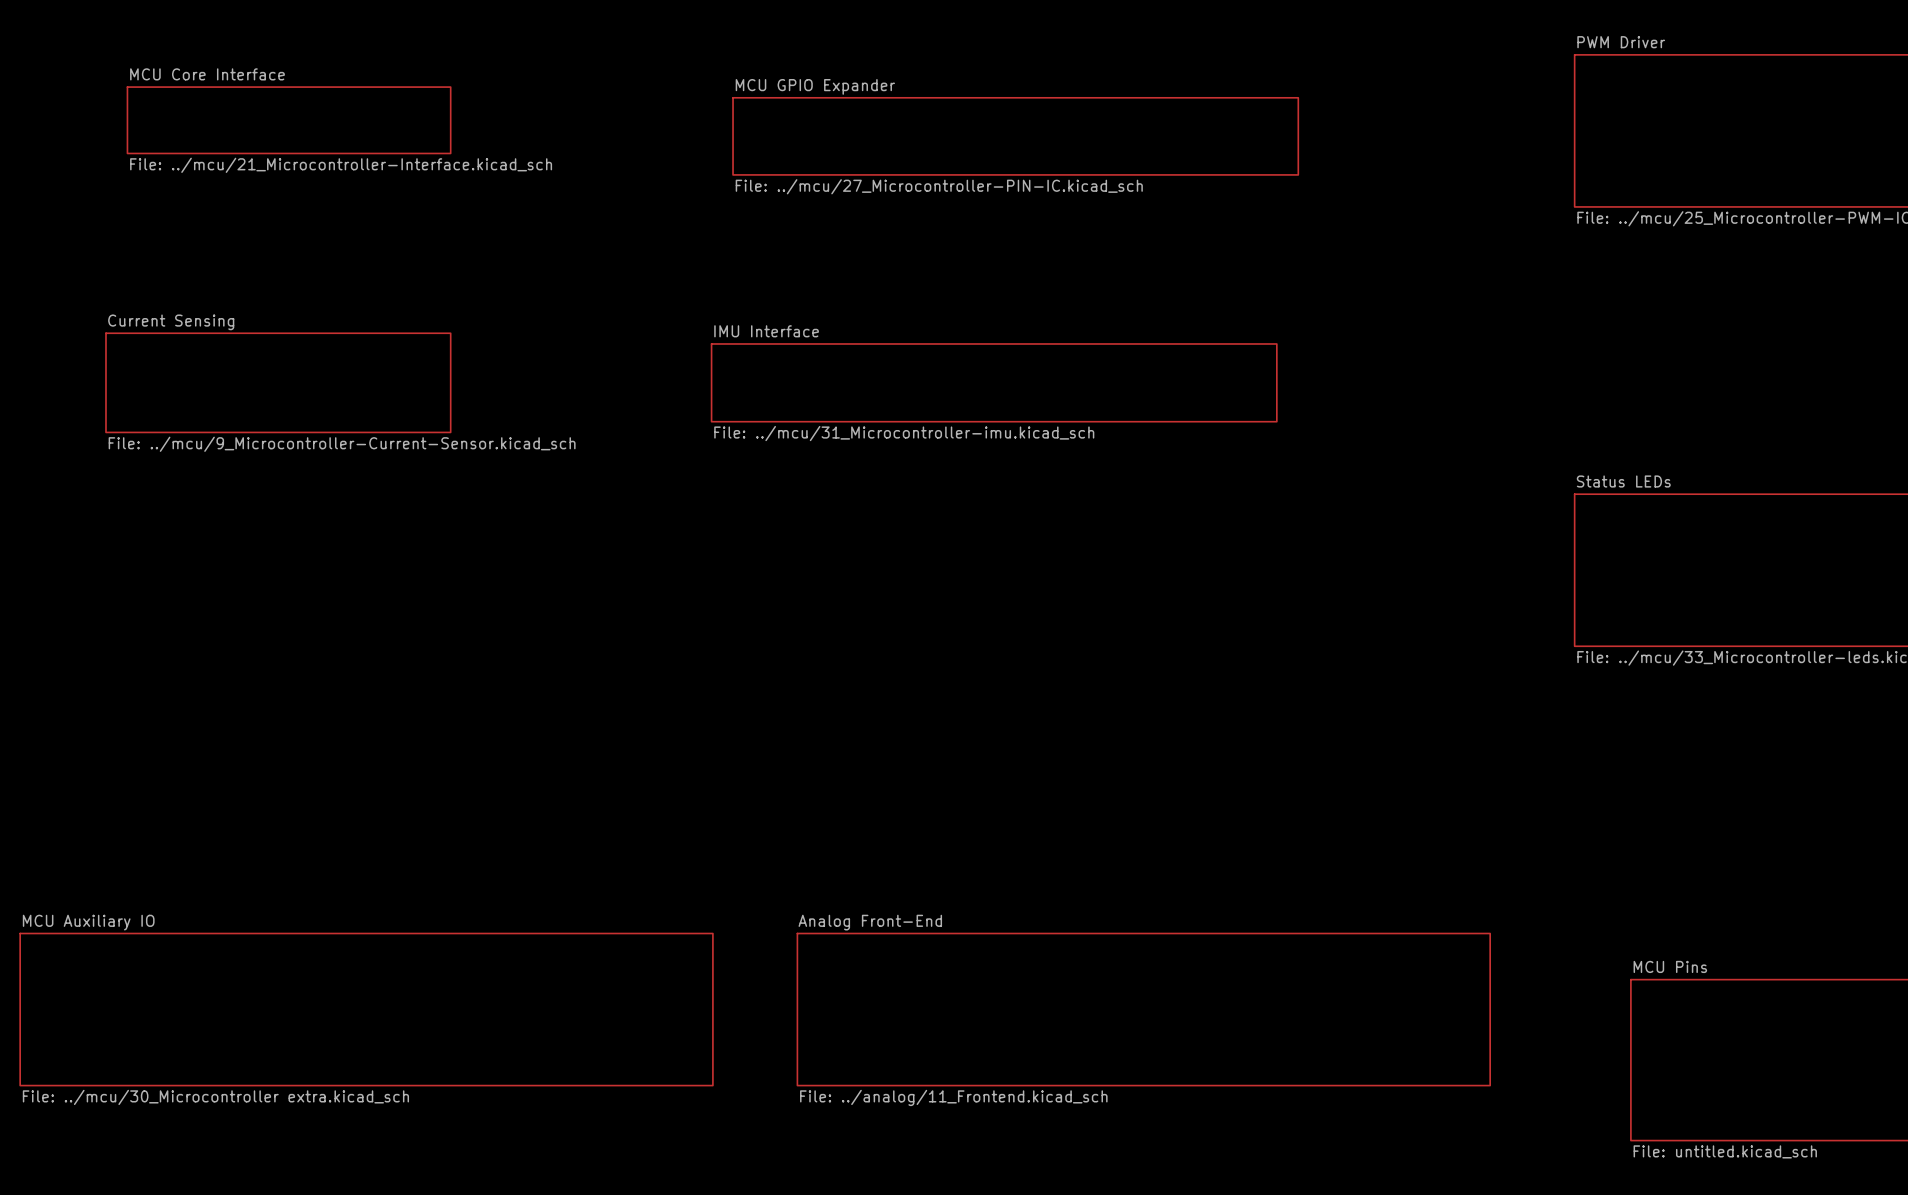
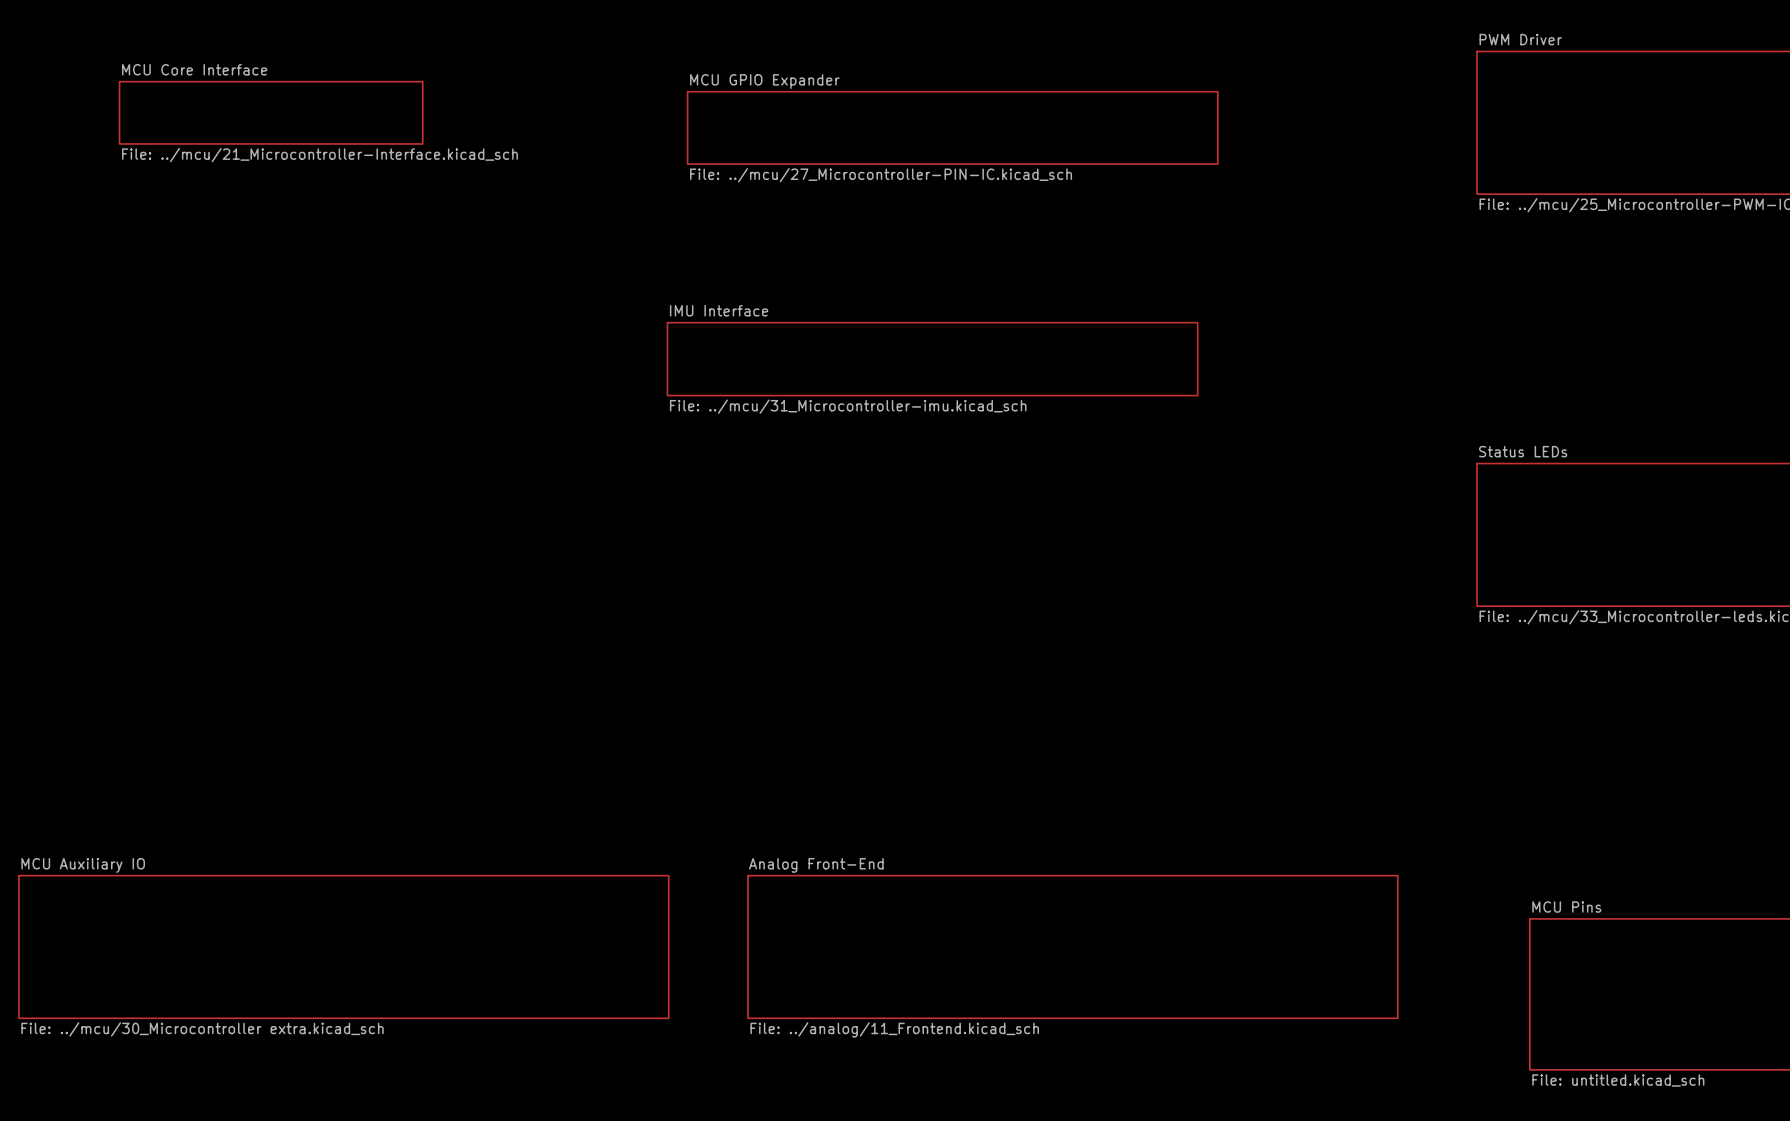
sheet Current Sensing: File: ../mcu/9_Microcontroller-Current-Sensor.kicad_sch (278, 382) -> none

